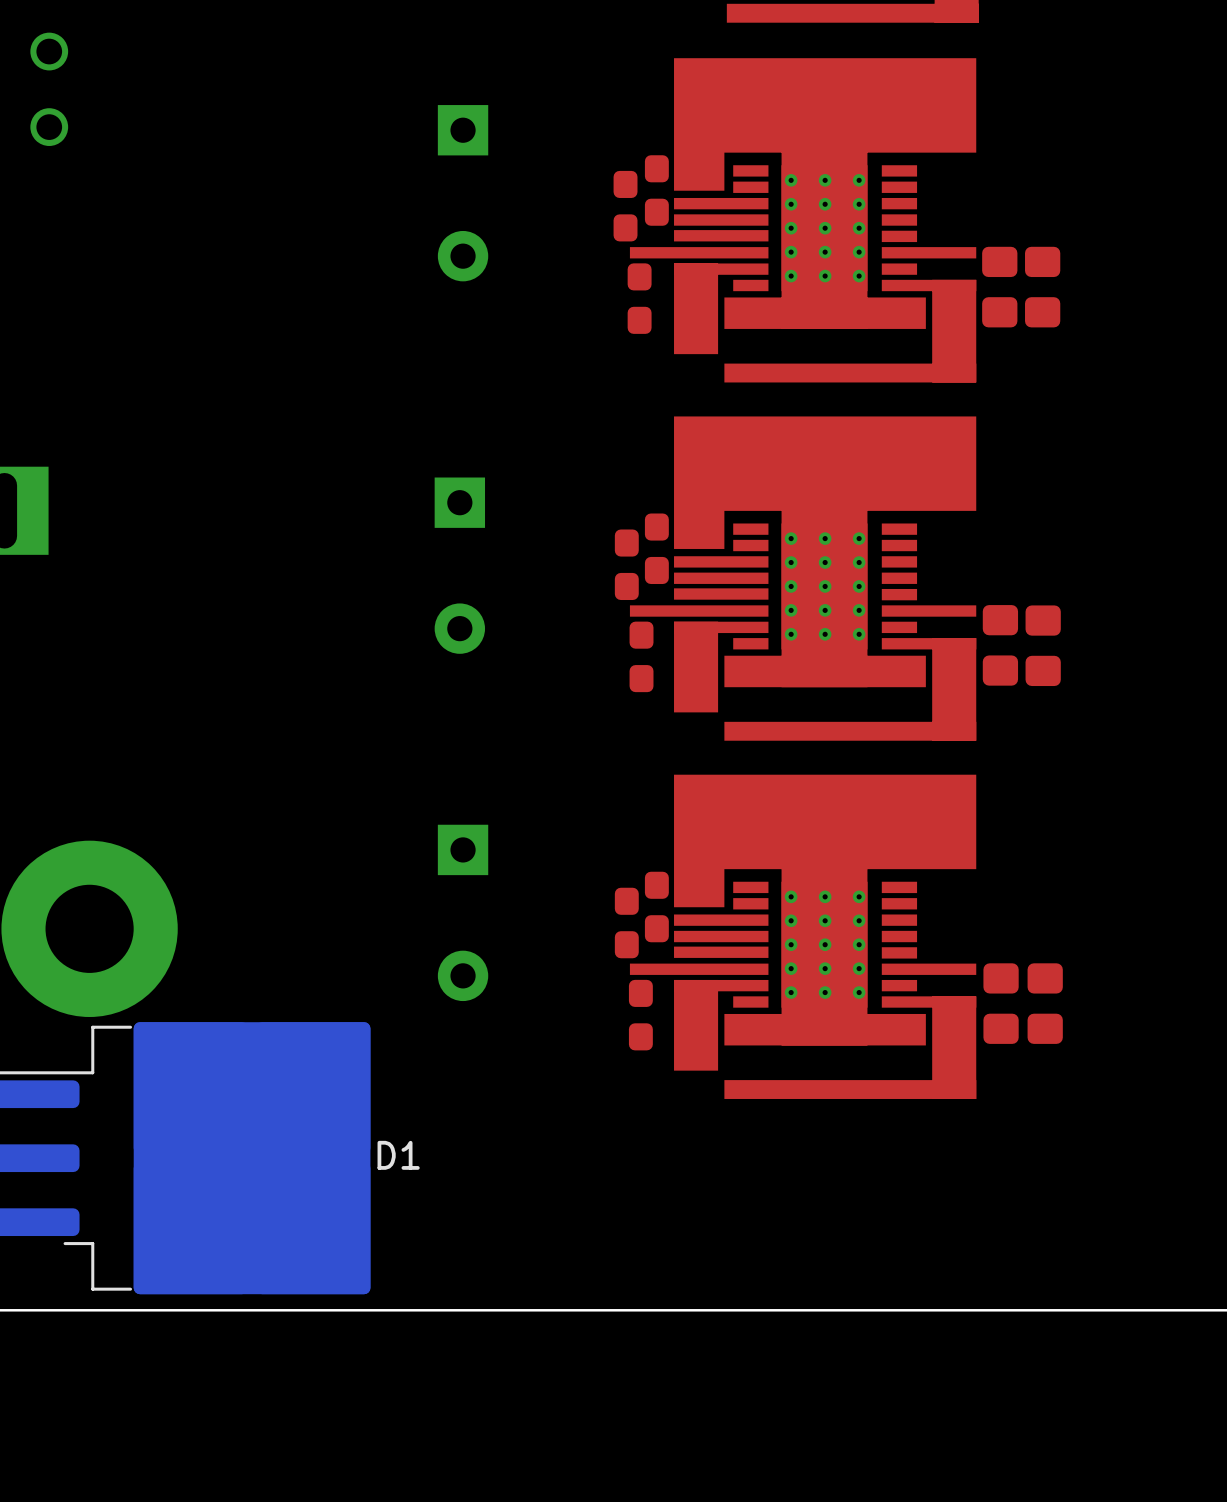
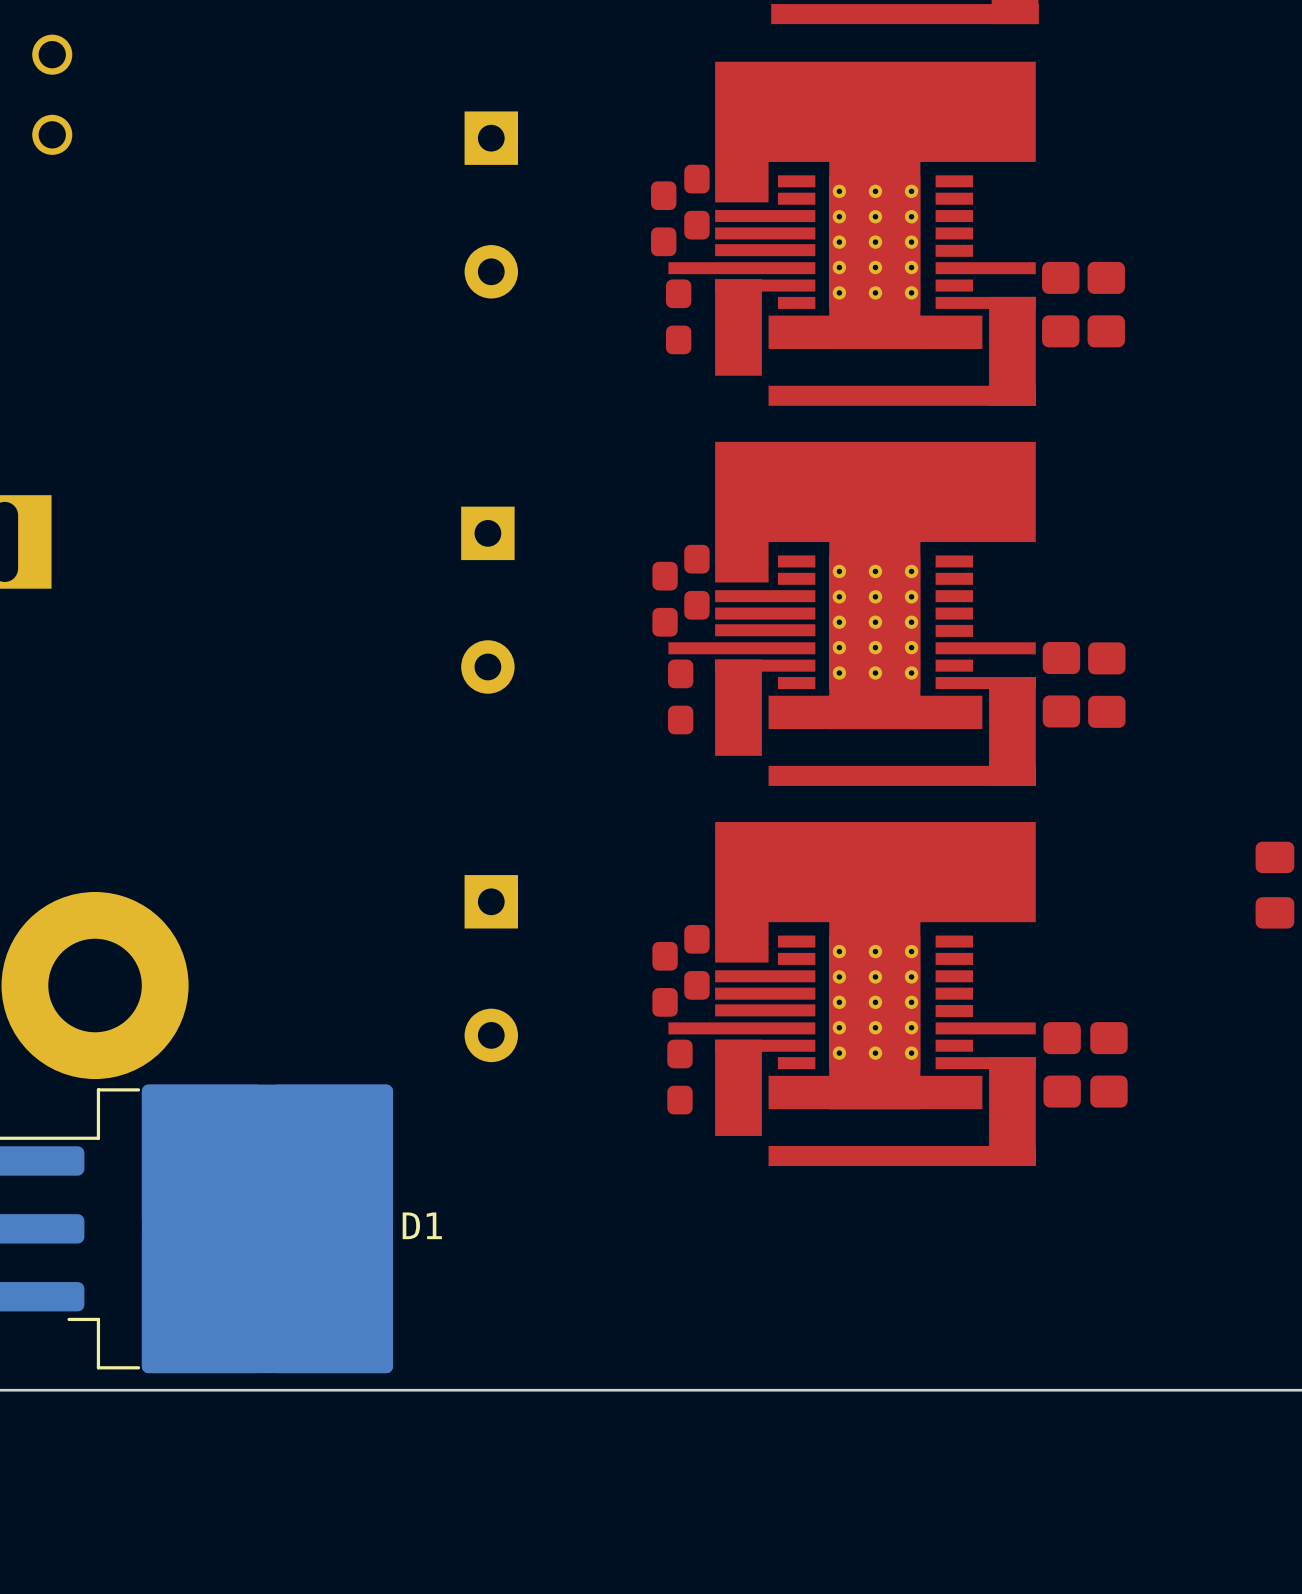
part: none -> (1274, 885)

